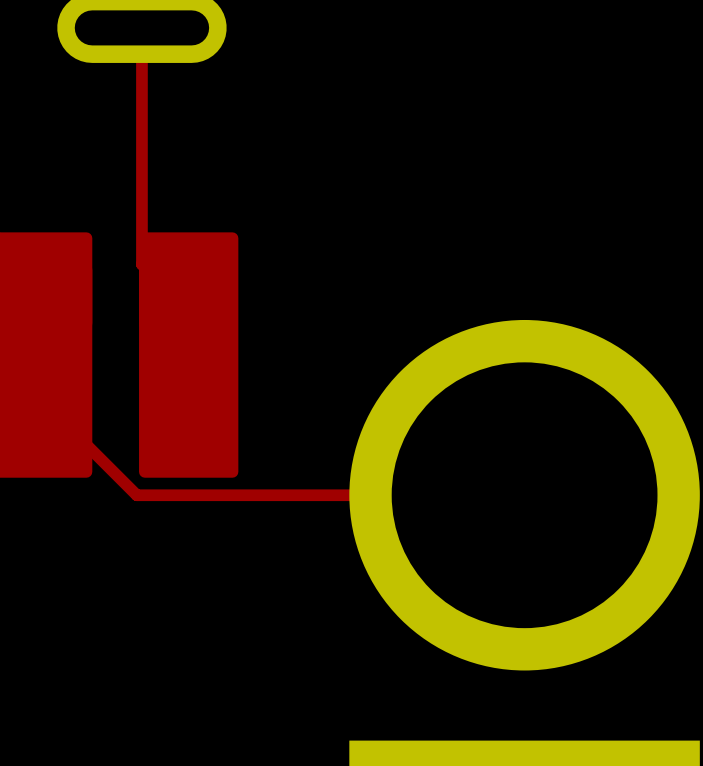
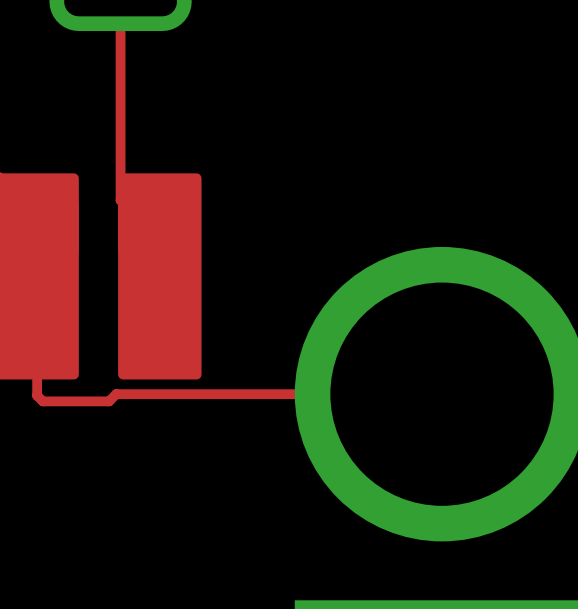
top track: (55, 413) (136, 495) -> (37, 276) (37, 395) (42, 401) (109, 401) (116, 394)

